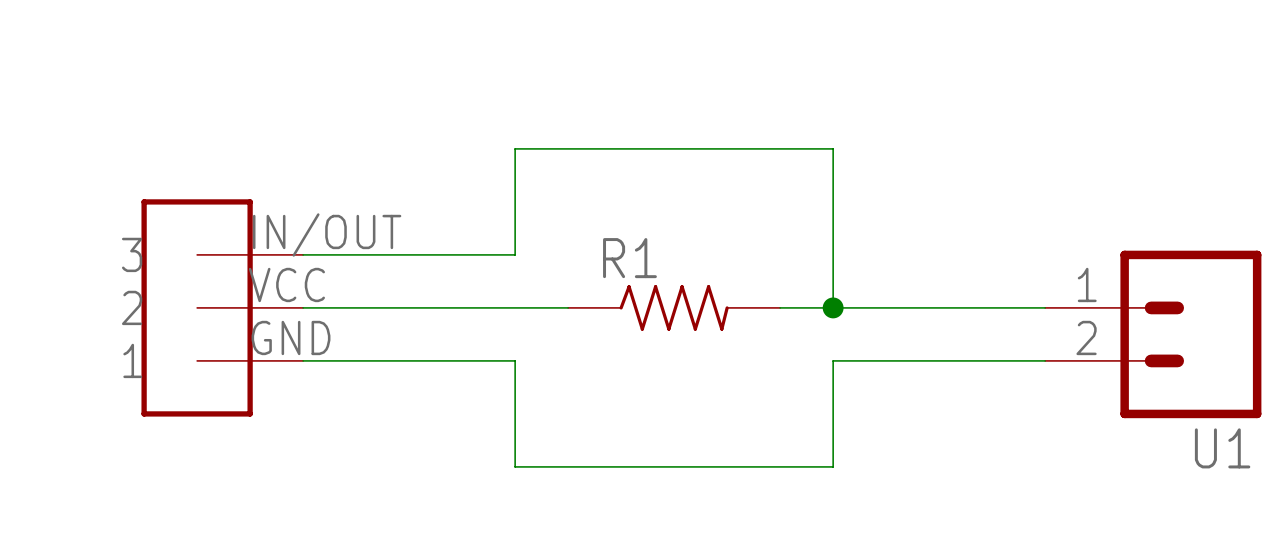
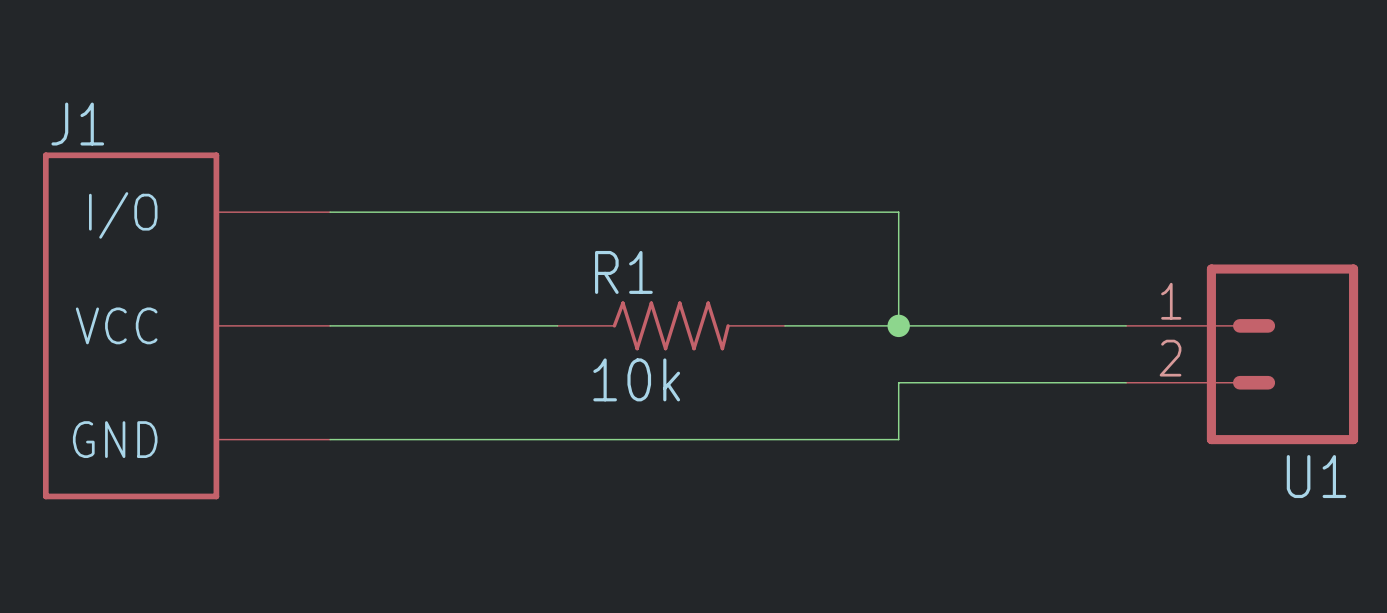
wire: (833, 201) (833, 148) (515, 148) (515, 254) (303, 254) -> (898, 212) (330, 212)
J1: none -> (186, 325)
part: (222, 307) -> none
R1 position: (674, 307) -> (671, 325)
R1 value: none -> 10k (636, 379)
wire: (303, 360) (515, 360) (515, 466) (833, 466) (833, 413) -> (330, 439) (898, 439)

